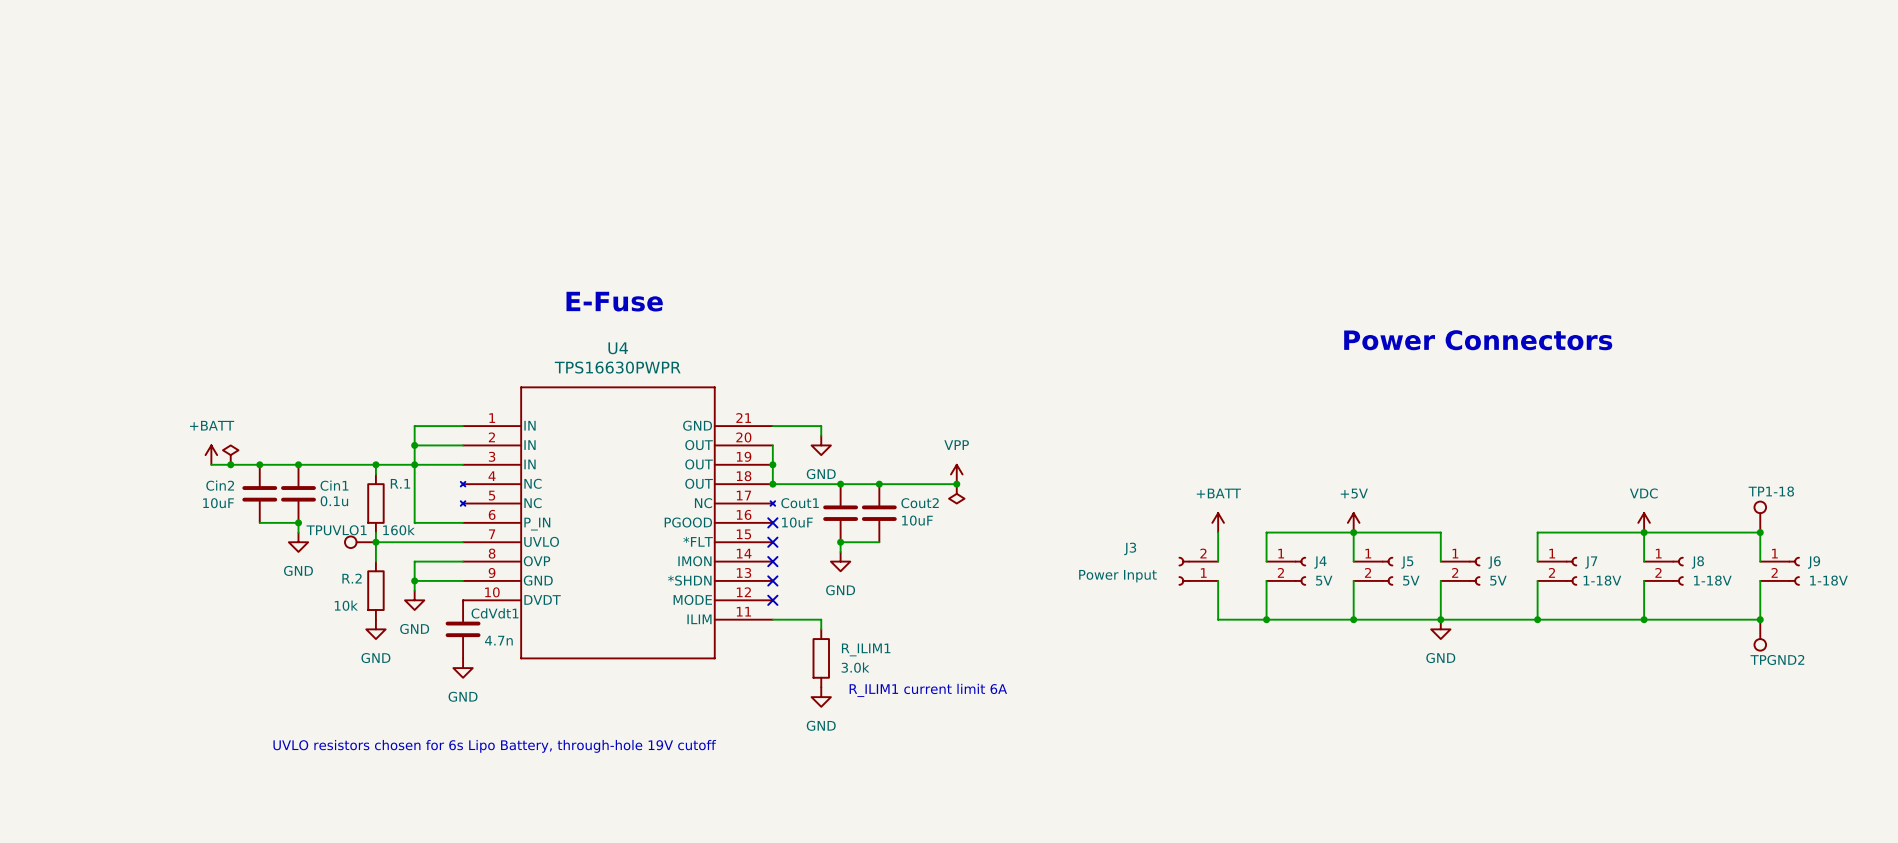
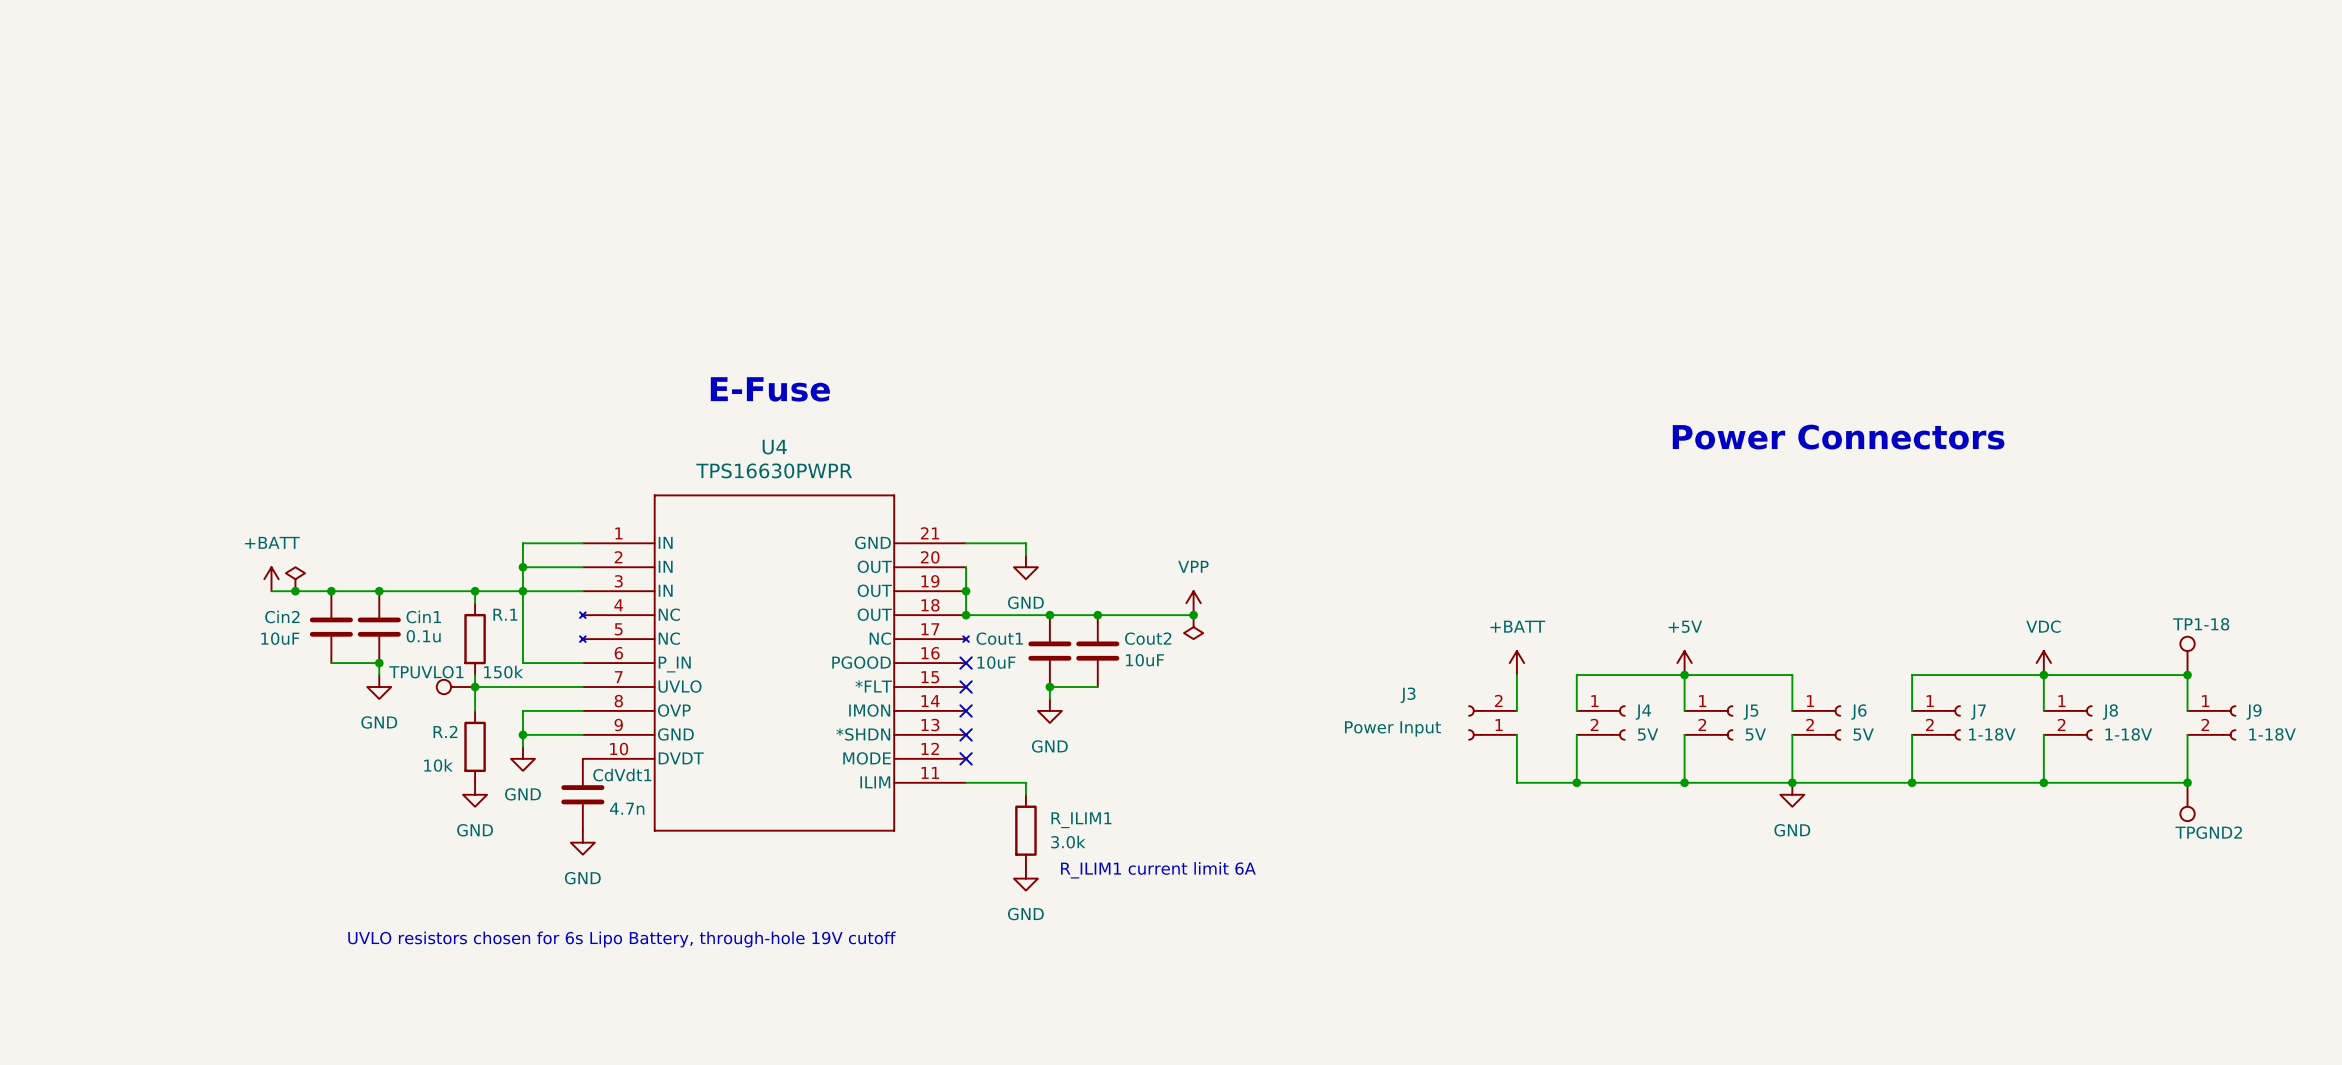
R.1 value: 160k (398, 530) -> 150k (503, 672)

